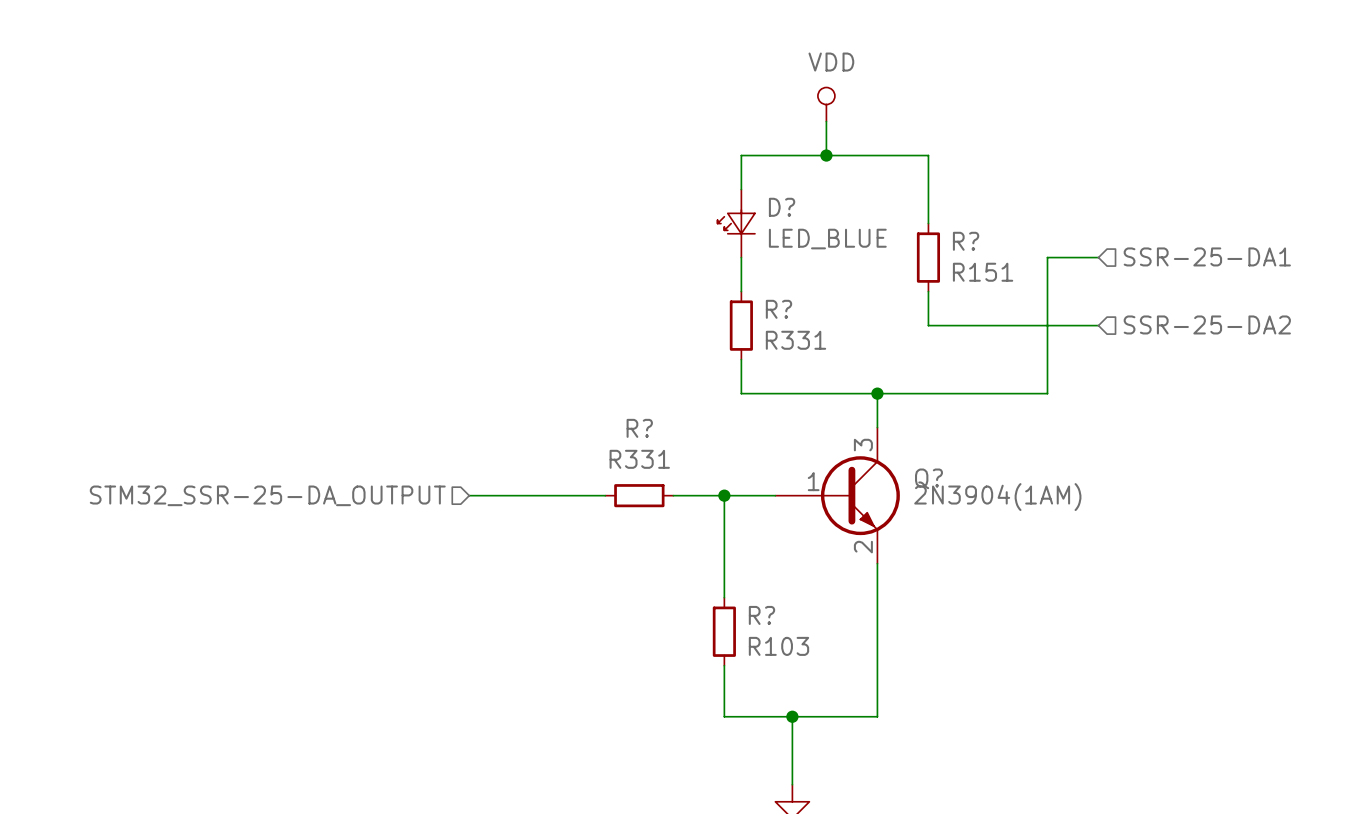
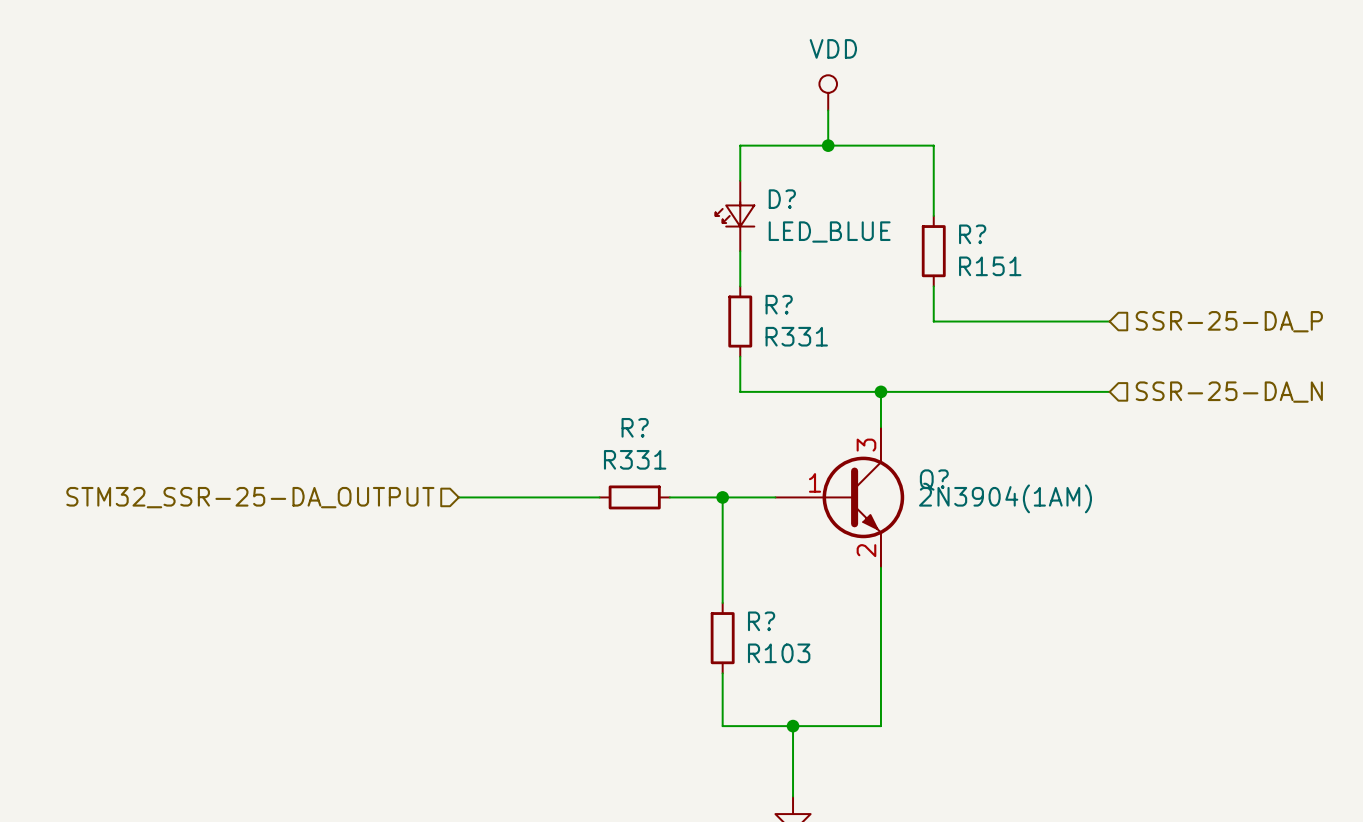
hierarchical label: SSR-25-DA1 (1207, 256) -> none
wire: (1098, 257) (1047, 257) (1047, 393) -> (1109, 391) (1056, 391)
hierarchical label: SSR-25-DA2 (1207, 324) -> SSR-25-DA_P (1229, 321)
hierarchical label: none -> SSR-25-DA_N (1229, 392)

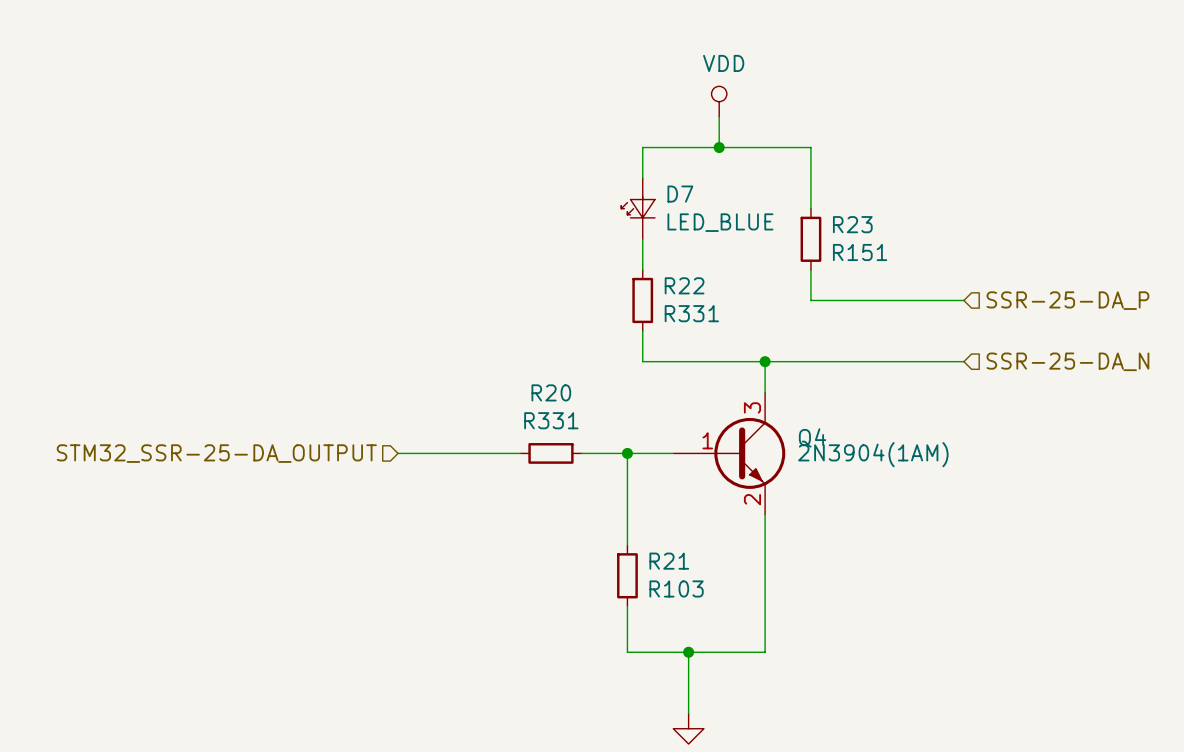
D? name: D? (782, 199) -> D7 (680, 194)
R? name: R? (972, 234) -> R23 (852, 224)
R? name: R? (779, 304) -> R22 (684, 285)
R? name: R? (635, 427) -> R20 (551, 392)
Q? name: Q? (934, 480) -> Q4 (812, 437)
R? name: R? (761, 621) -> R21 (669, 561)

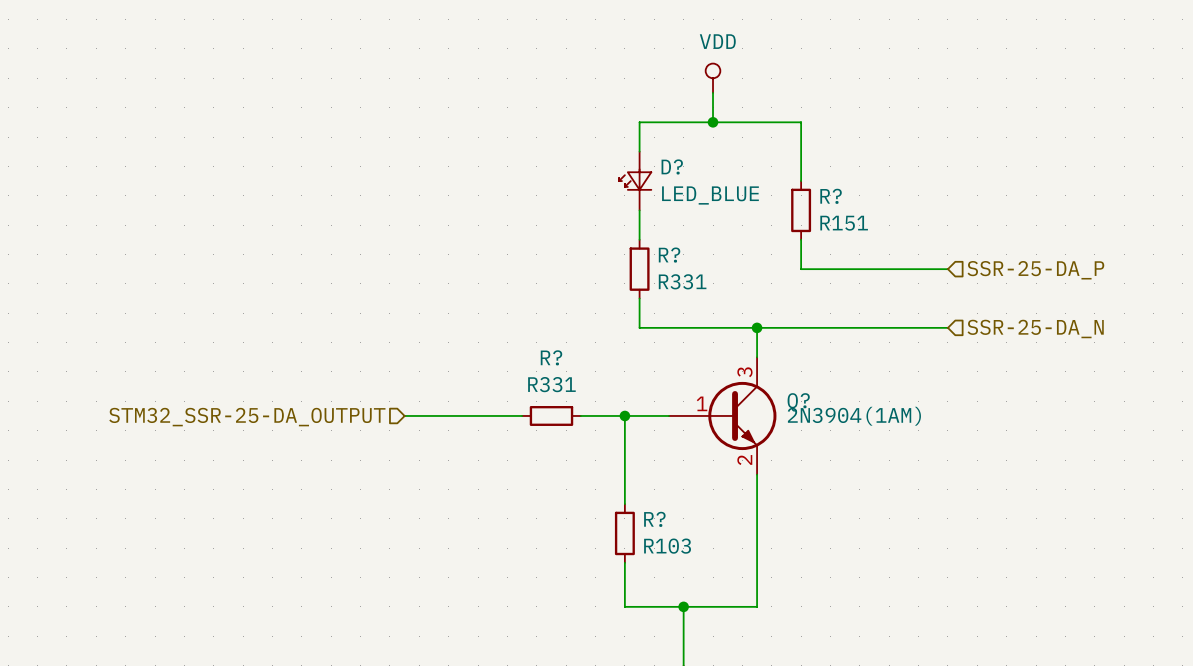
D7 name: D7 (680, 194) -> D? (672, 166)
R23 name: R23 (852, 224) -> R? (831, 196)
R22 name: R22 (684, 285) -> R? (669, 255)
R20 name: R20 (551, 392) -> R? (551, 357)
Q4 name: Q4 (812, 437) -> Q? (798, 402)
R21 name: R21 (669, 561) -> R? (654, 519)

